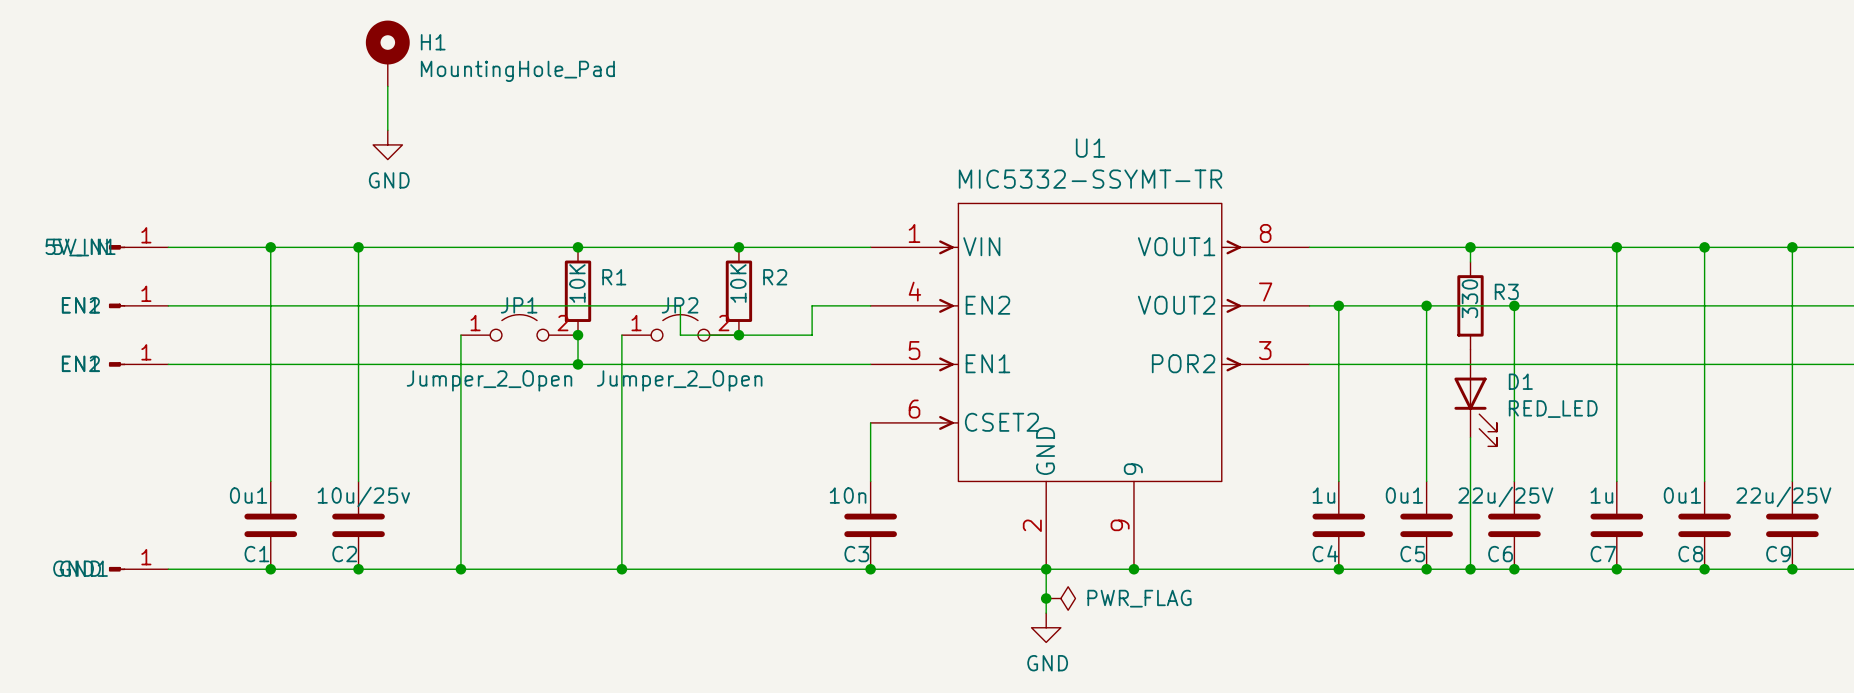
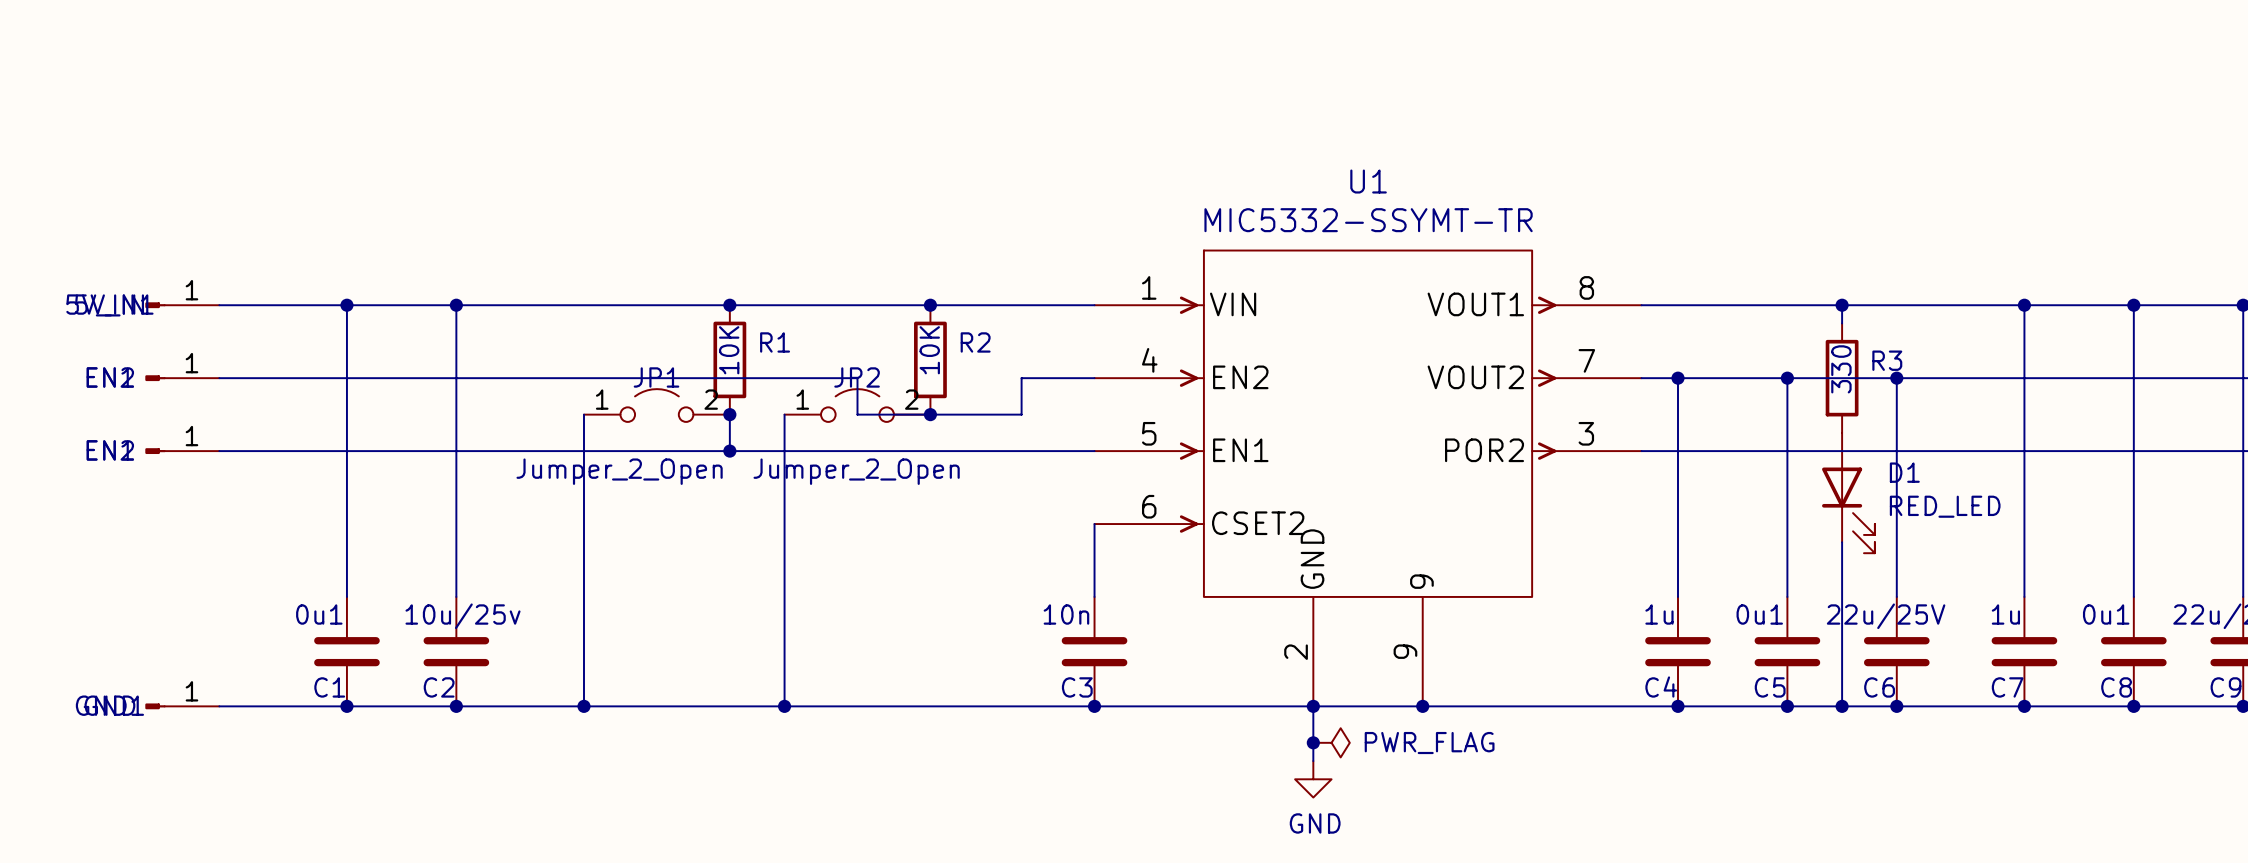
H1: MountingHole_Pad (387, 53) -> none
wire: (387, 86) (387, 130) -> none
power symbol: GND (387, 144) -> none

